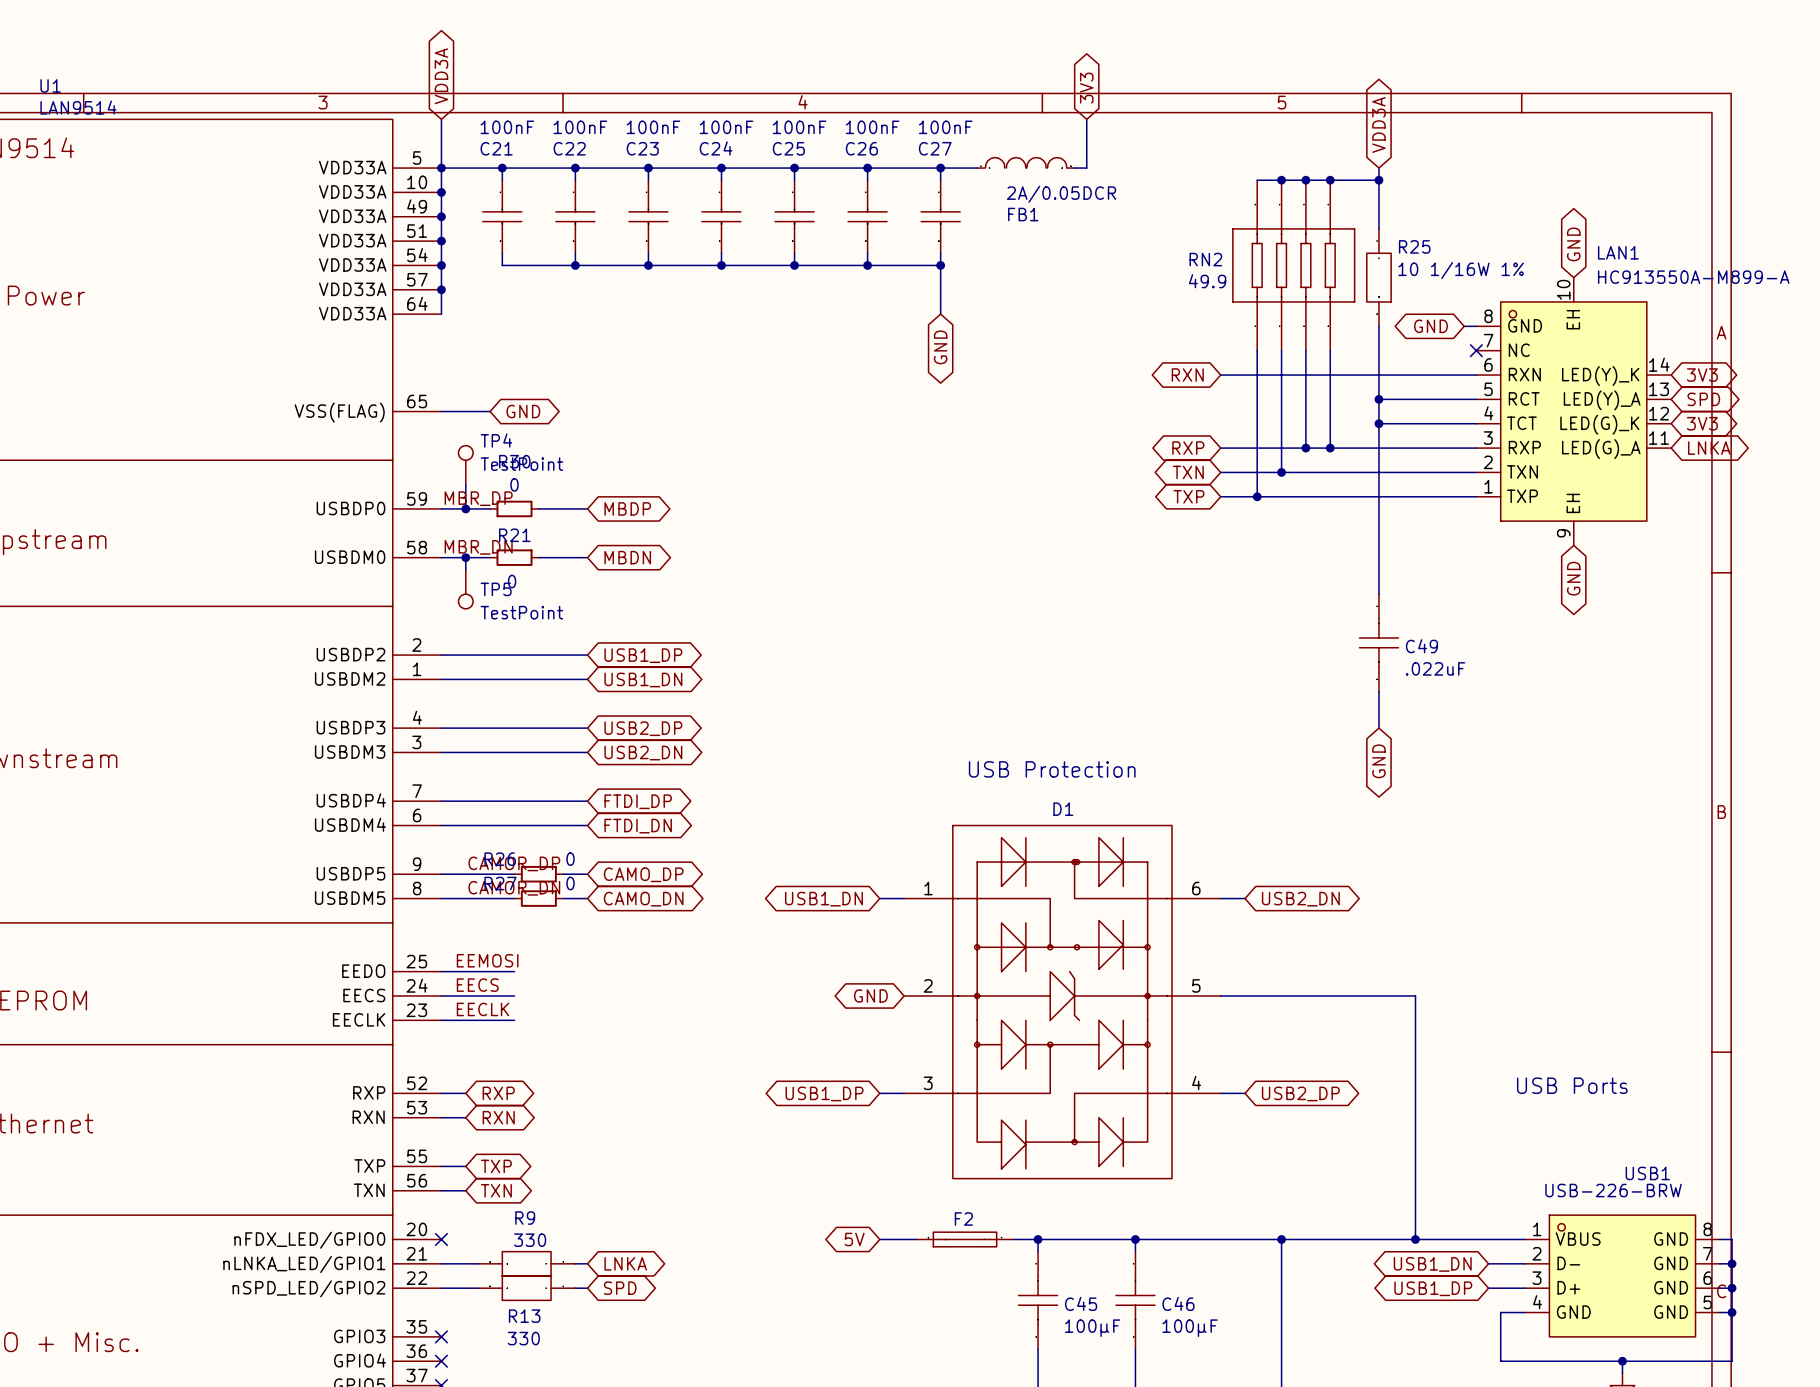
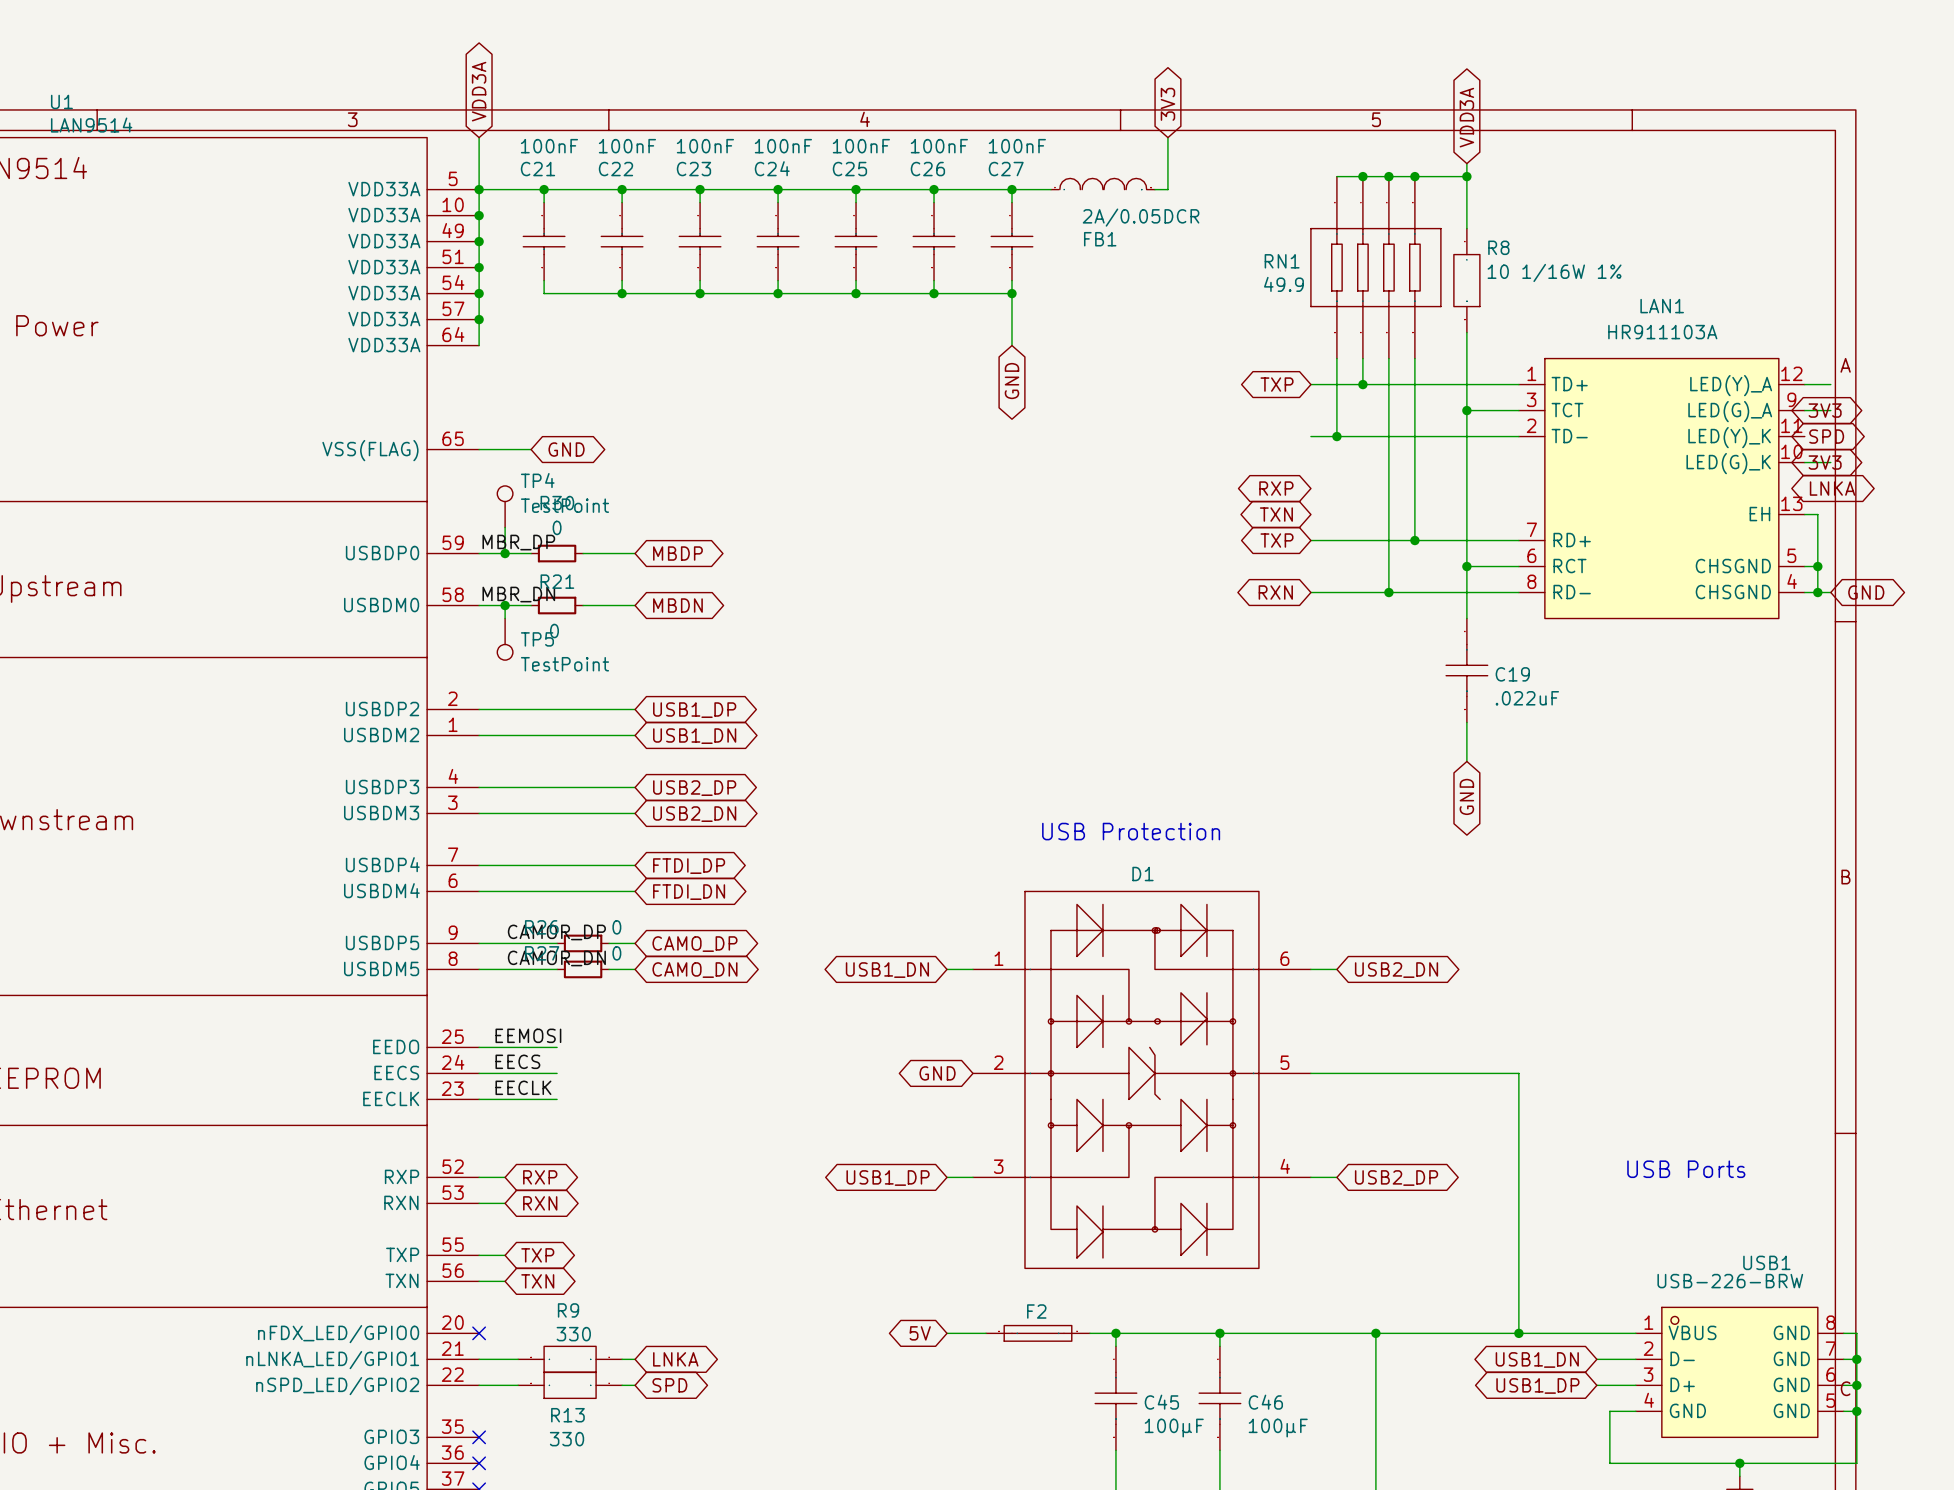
global label position: VDD3A (1378, 124) -> VDD3A (1466, 117)
junction: none -> (1362, 176)
junction: none -> (1388, 176)
junction: none -> (1414, 176)
junction: none -> (1466, 176)
wire: (1378, 168) (1378, 228) -> (1466, 163) (1466, 228)
wire: (1257, 180) (1378, 180) -> (1336, 176) (1466, 176)
junction: (1281, 180) -> none
junction: (1305, 180) -> none
junction: (1330, 180) -> none
junction: (1378, 180) -> none
RN1: none -> 49.9 (1375, 267)
global label: GND (1573, 244) -> none
LAN1 name position: LAN1 (1618, 252) -> LAN1 (1662, 306)
R8: none -> 10 1/16W 1% (1466, 280)
RN2: 49.9 (1293, 265) -> none
R25: 10 1/16W 1% (1378, 277) -> none
LAN1 symbol: [1476, 277, 1672, 546] -> [1518, 358, 1805, 619]
LAN1 value: HC913550A-M899-A (1693, 277) -> HR911103A (1662, 332)
wire: none -> (1336, 358) (1336, 436)
wire: none -> (1362, 358) (1362, 384)
wire: none -> (1388, 358) (1388, 592)
wire: none -> (1414, 358) (1414, 540)
wire: (1378, 326) (1378, 594) -> (1466, 332) (1466, 618)
global label: GND (1430, 326) -> none
global label: none -> TXP (1277, 384)
wire: none -> (1310, 384) (1518, 384)
wire: (1257, 350) (1257, 496) -> none
junction: none -> (1362, 384)
wire: (1281, 350) (1281, 472) -> none
wire: (1305, 350) (1305, 448) -> none
wire: (1330, 350) (1330, 448) -> none
no-connect mark: (1476, 350) -> none
wire: none -> (1804, 384) (1830, 384)
global label position: RXN (1187, 375) -> RXN (1275, 592)
wire: (1220, 375) (1366, 375) -> none
junction: none -> (1466, 410)
wire: none -> (1804, 410) (1830, 410)
wire: none -> (1310, 436) (1479, 436)
junction: none -> (1336, 436)
junction: (1378, 399) -> none
wire: (1378, 423) (1476, 423) -> none
junction: (1378, 423) -> none
wire: none -> (1804, 462) (1830, 462)
wire: (1220, 448) (1476, 448) -> none
junction: (1305, 448) -> none
junction: (1330, 448) -> none
wire: (1220, 472) (1476, 472) -> none
junction: (1281, 472) -> none
wire: none -> (1804, 514) (1817, 514) (1817, 592)
junction: (1257, 496) -> none
junction: none -> (1414, 540)
wire: none -> (1466, 566) (1518, 566)
junction: none -> (1466, 566)
wire: none -> (1804, 566) (1817, 566)
junction: none -> (1817, 566)
wire: none -> (1310, 592) (1518, 592)
junction: none -> (1388, 592)
wire: none -> (1804, 592) (1830, 592)
junction: none -> (1817, 592)
global label: none -> GND (1866, 592)
global label: GND (1573, 578) -> none
C19: none -> .022uF (1466, 670)
C49: .022uF (1378, 642) -> none
wire: (1378, 691) (1378, 728) -> (1466, 722) (1466, 761)
global label position: GND (1378, 761) -> GND (1466, 796)

